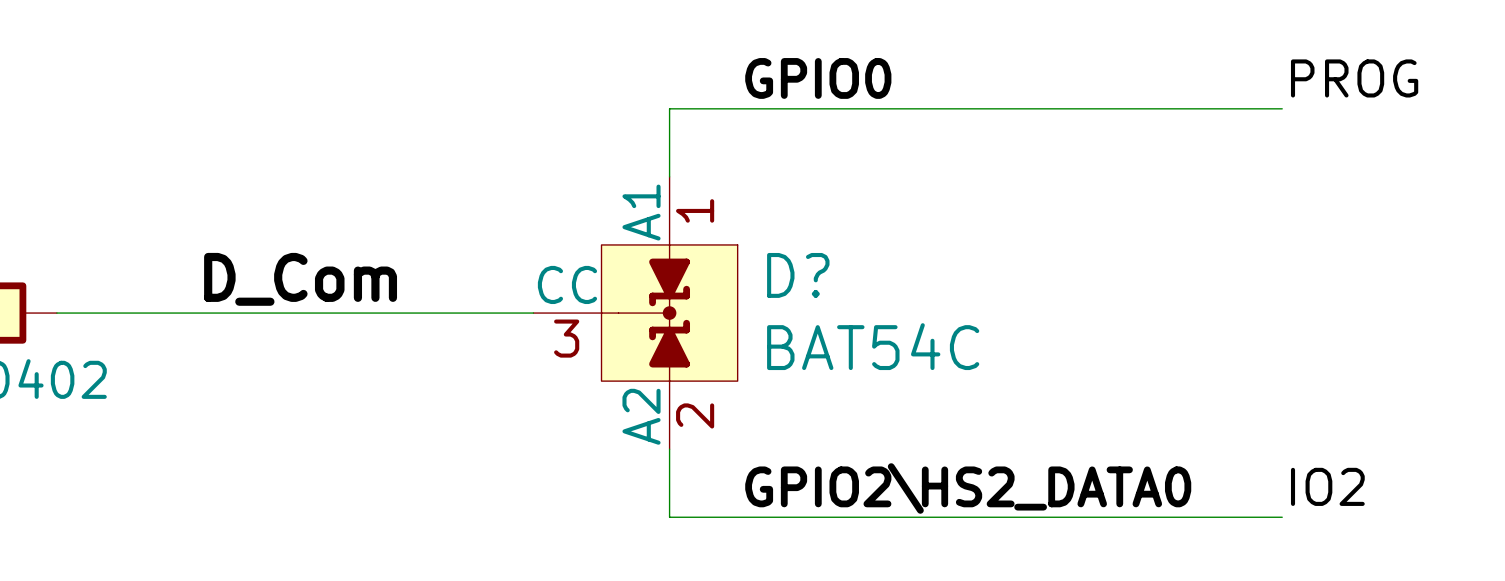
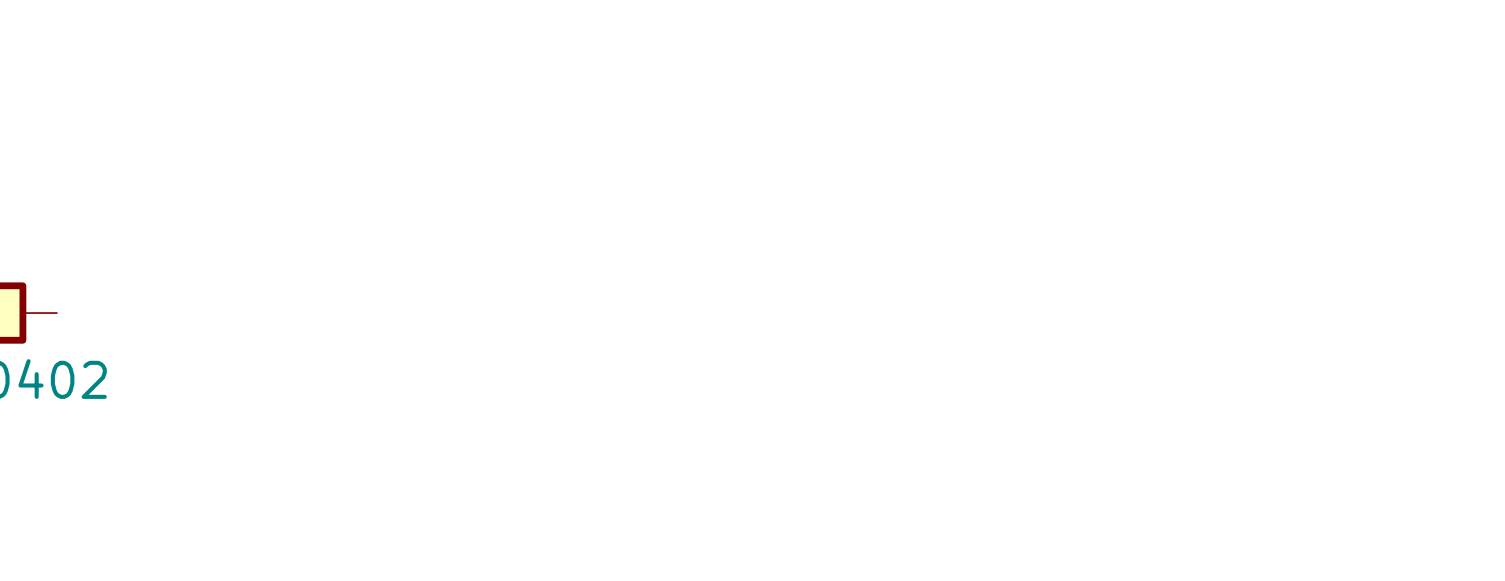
label: GPIO0 (818, 78) -> none
label: PROG (1354, 78) -> none
wire: (1282, 108) (669, 108) (669, 176) -> none
label: D_Com (300, 279) -> none
wire: (56, 313) (533, 313) -> none
D?: BAT54C (635, 313) -> none
wire: (669, 449) (669, 517) (1282, 517) -> none
label: IO2 (1327, 486) -> none
label: GPIO2\HS2_DATA0 (968, 488) -> none

